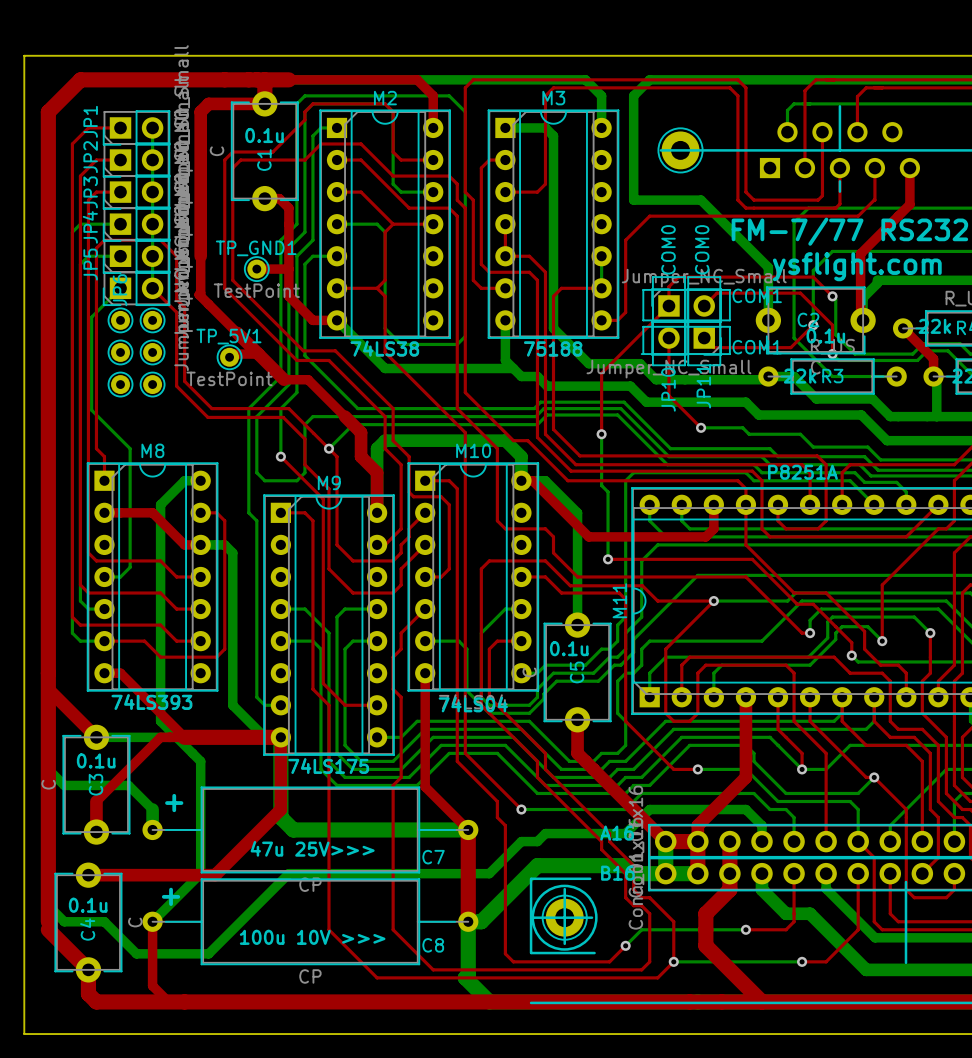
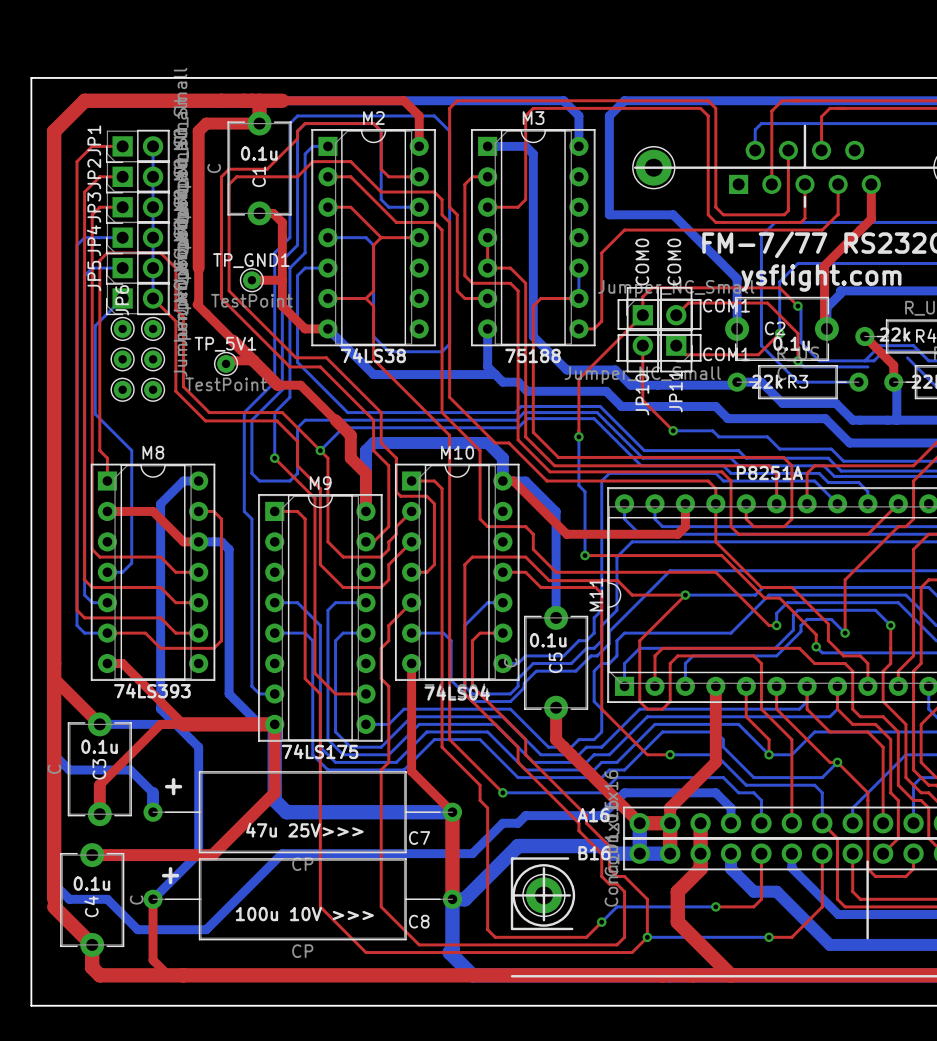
bottom track: none -> (918, 350) (913, 345) (880, 345) (864, 360)
bottom track: (948, 350) (927, 350) (917, 360) (906, 360) -> none

